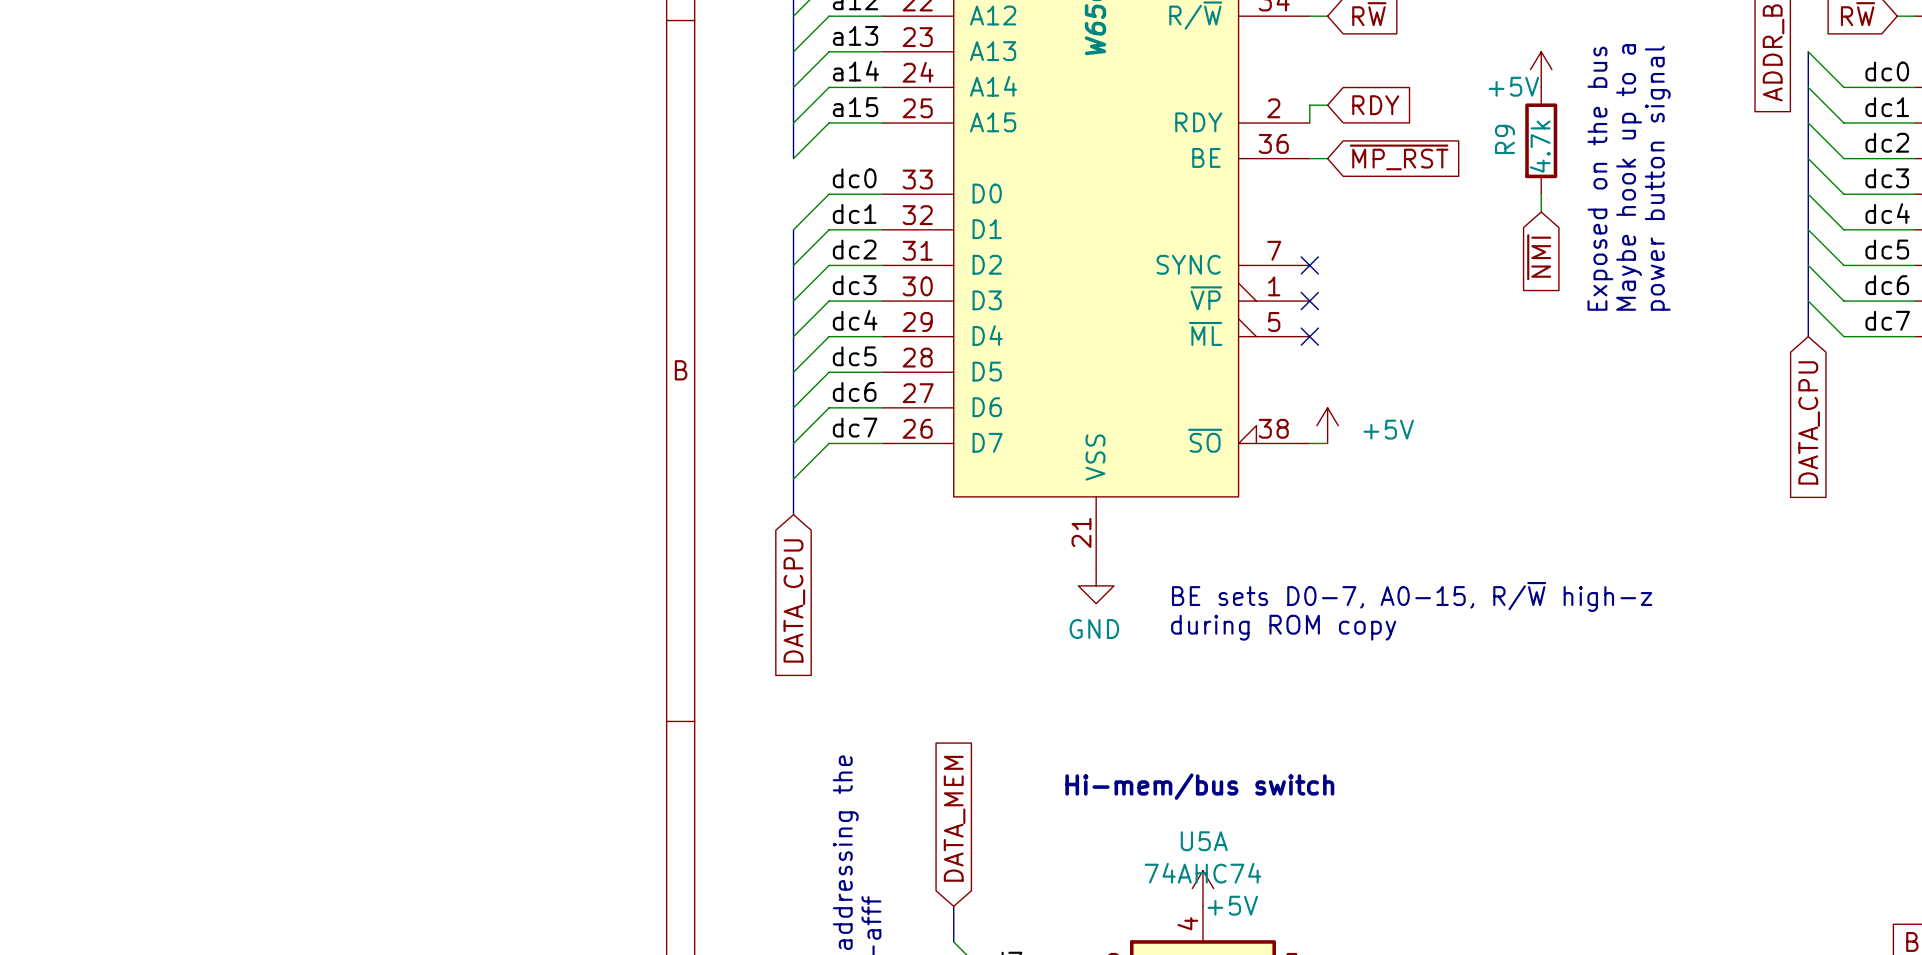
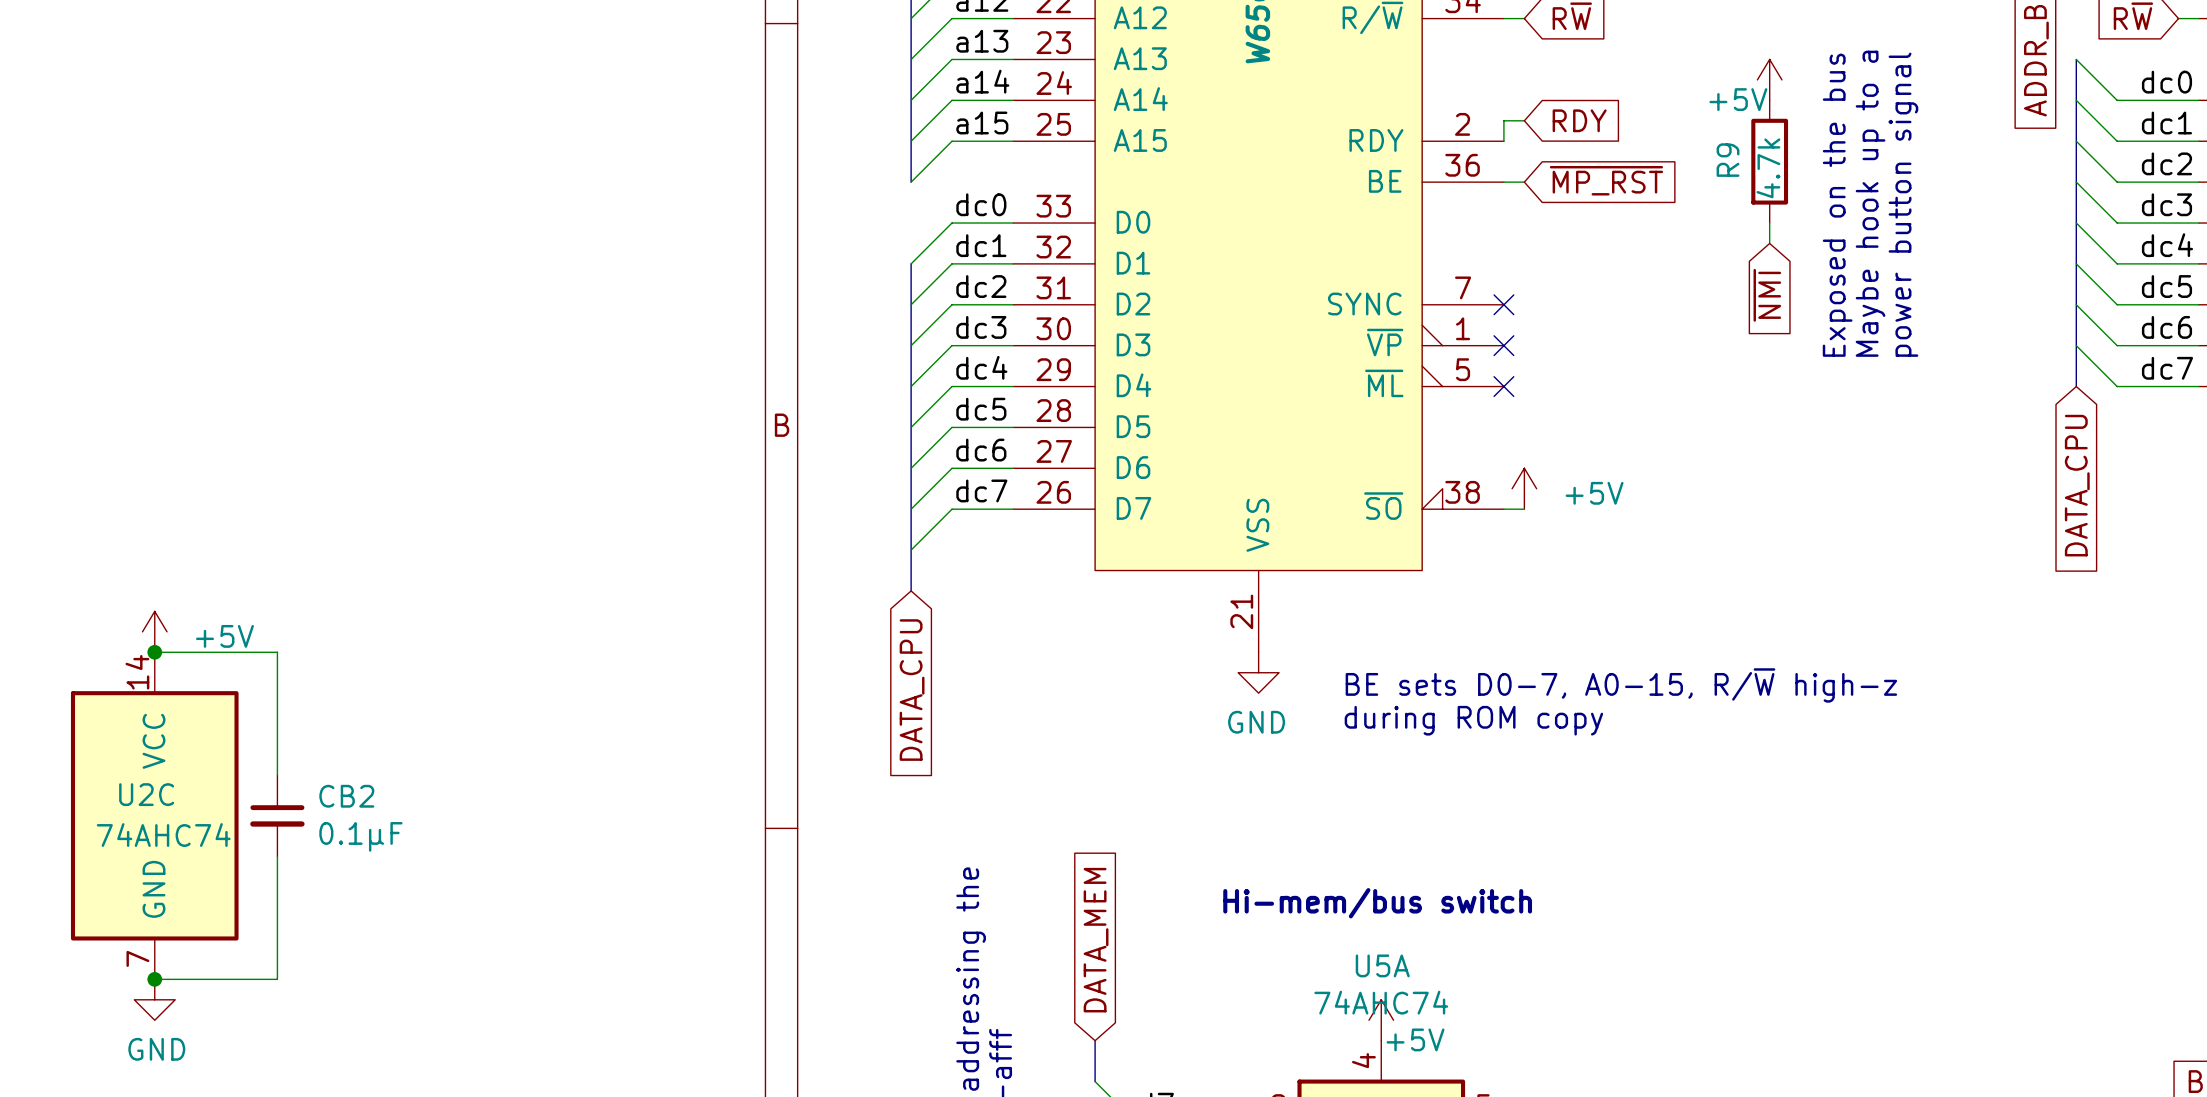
power symbol: none -> +5V (154, 631)
wire: none -> (154, 652) (277, 652) (277, 774)
junction: none -> (154, 652)
U2C: none -> 74AHC74 (154, 815)
CB2: none -> 0.1μF (277, 815)
wire: none -> (277, 856) (277, 979) (154, 979)
junction: none -> (154, 979)
power symbol: none -> GND (154, 999)

